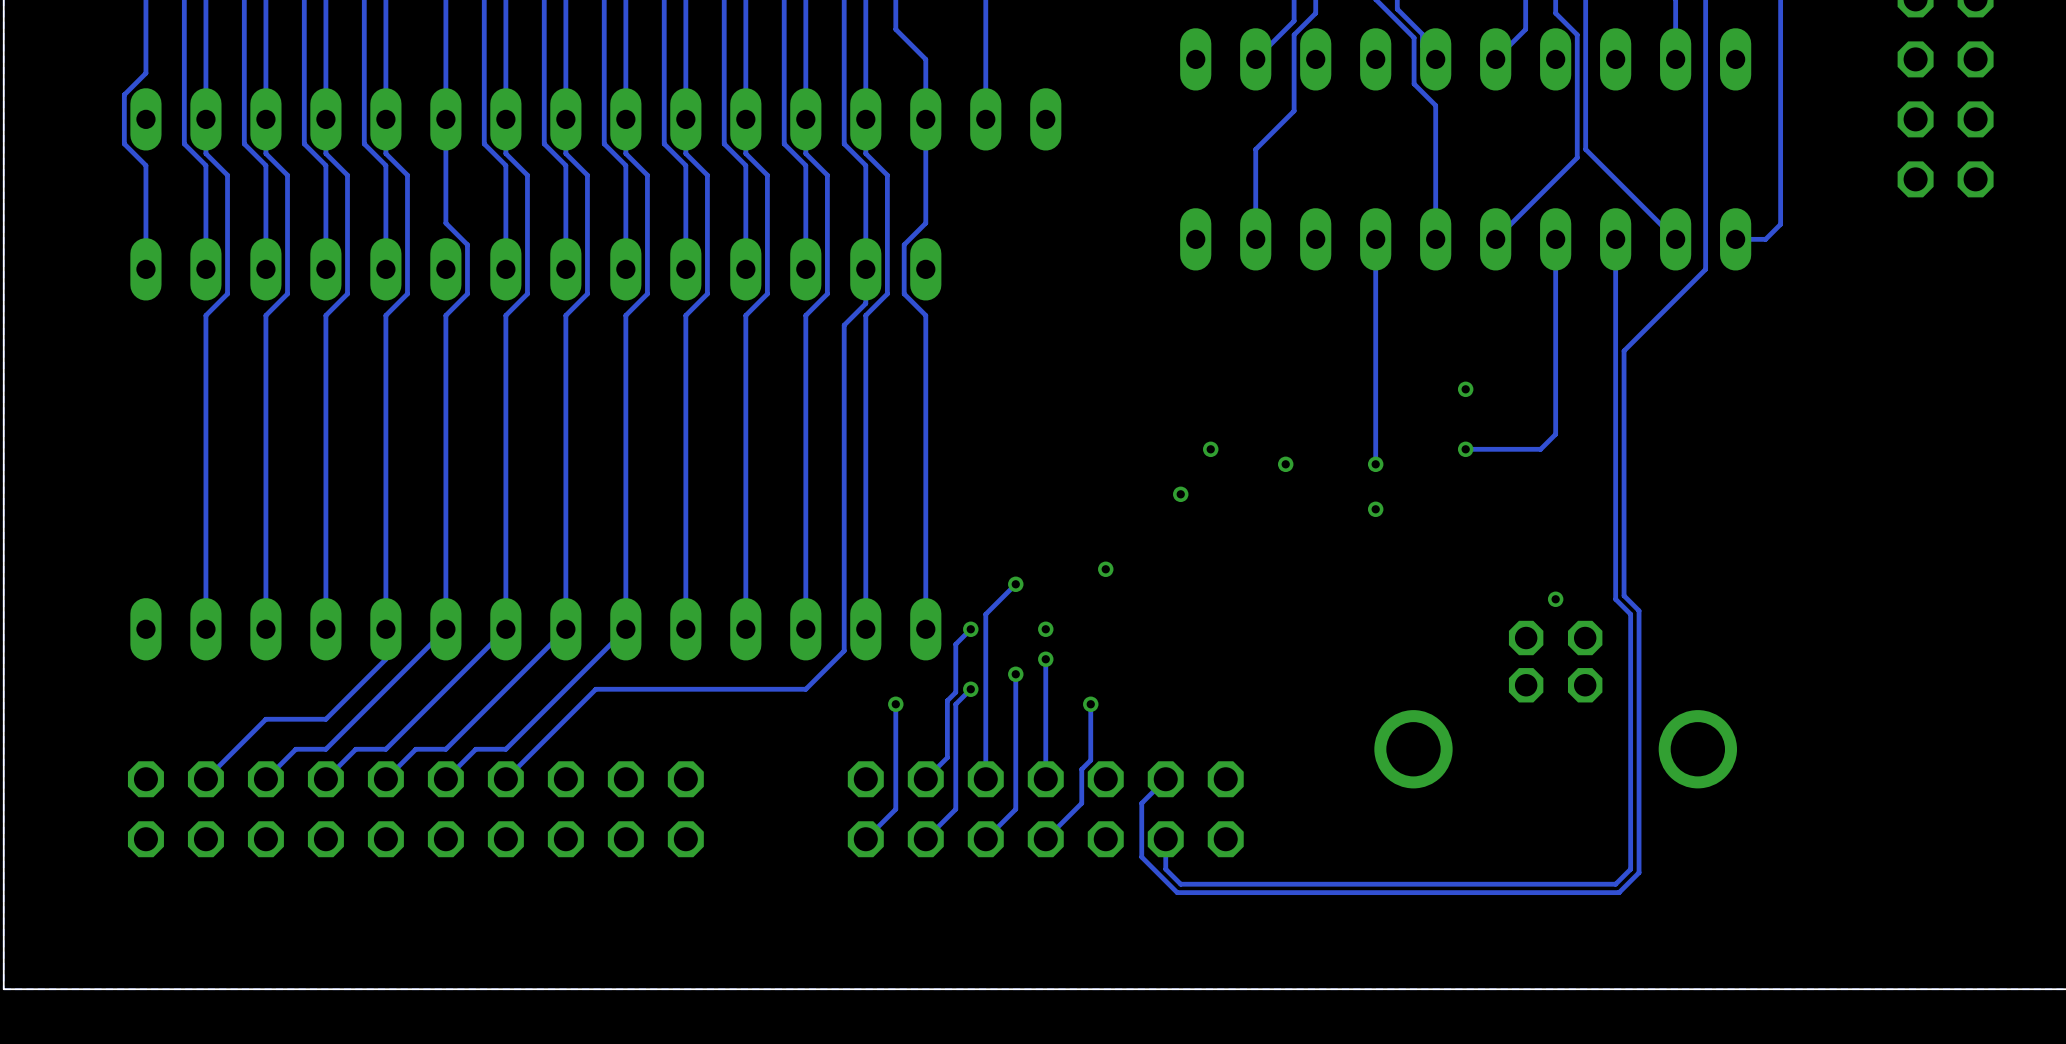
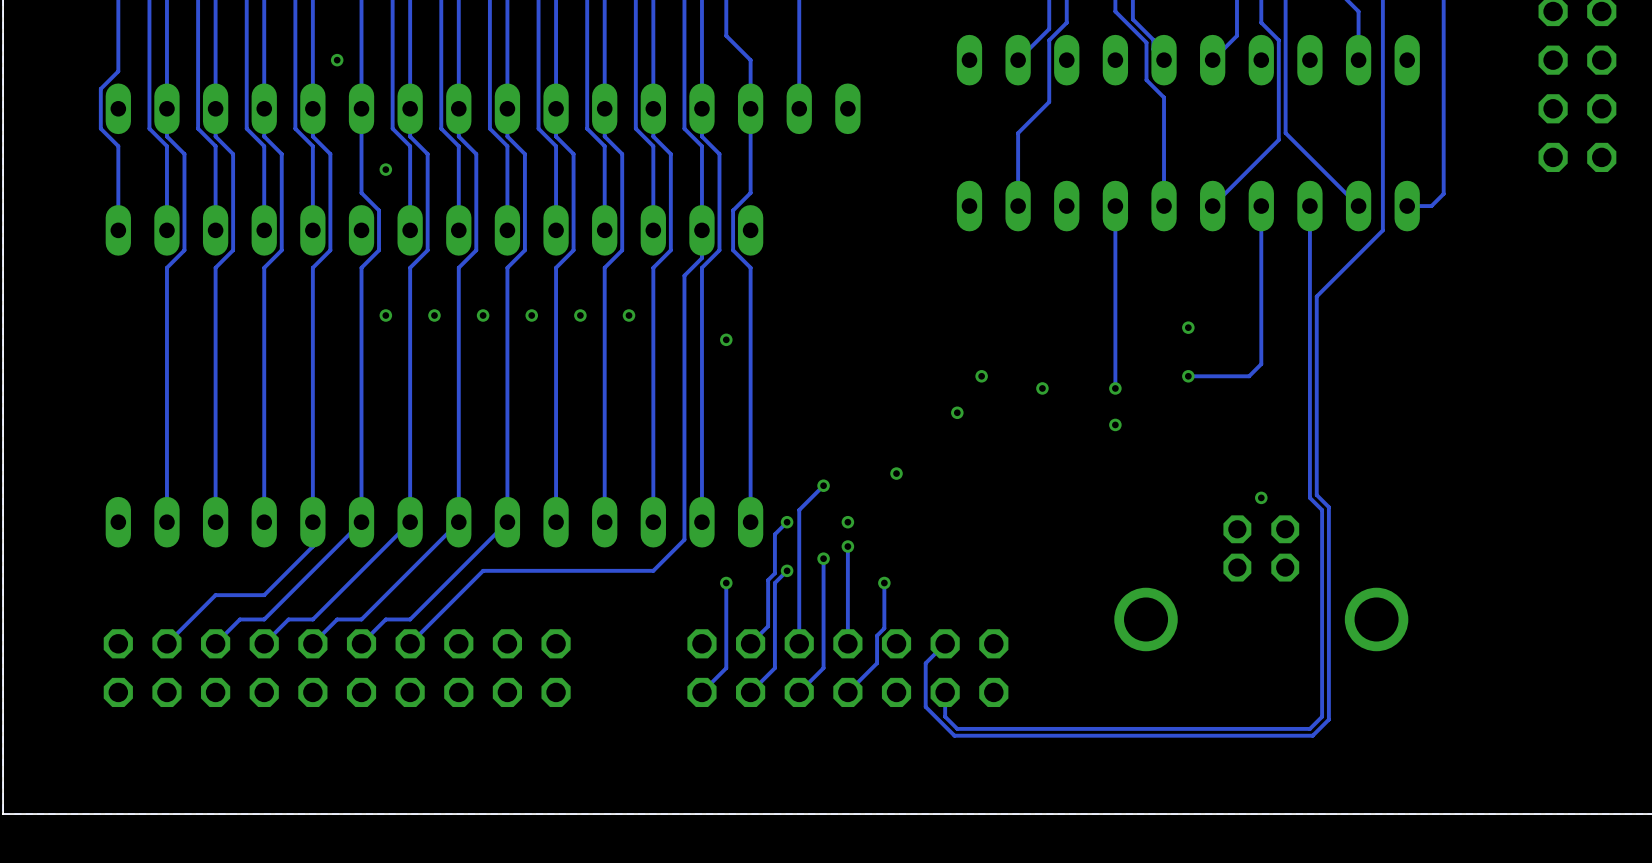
via: none -> (337, 60)
via: none -> (385, 169)
via: none -> (385, 315)
via: none -> (434, 315)
via: none -> (483, 315)
via: none -> (531, 315)
via: none -> (580, 315)
via: none -> (629, 315)
via: none -> (726, 339)

